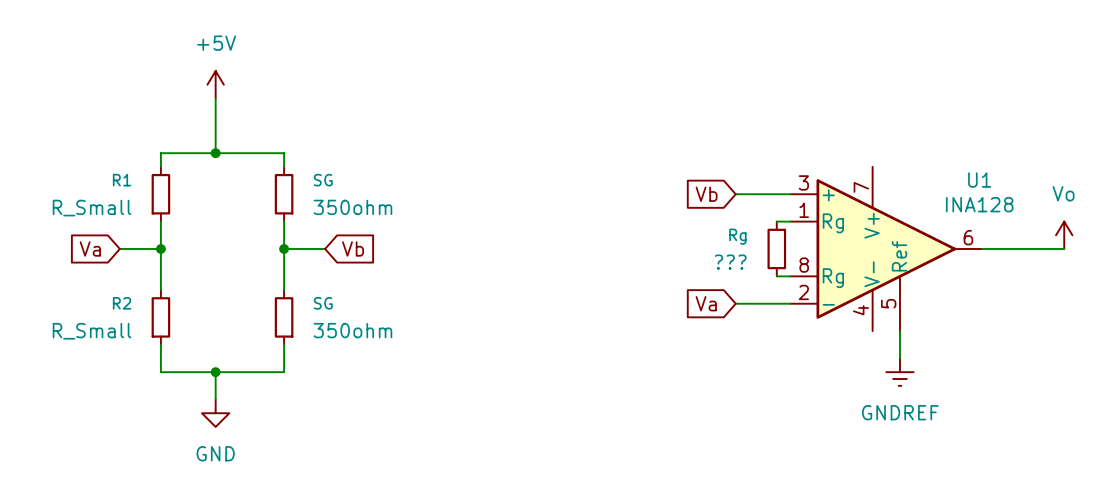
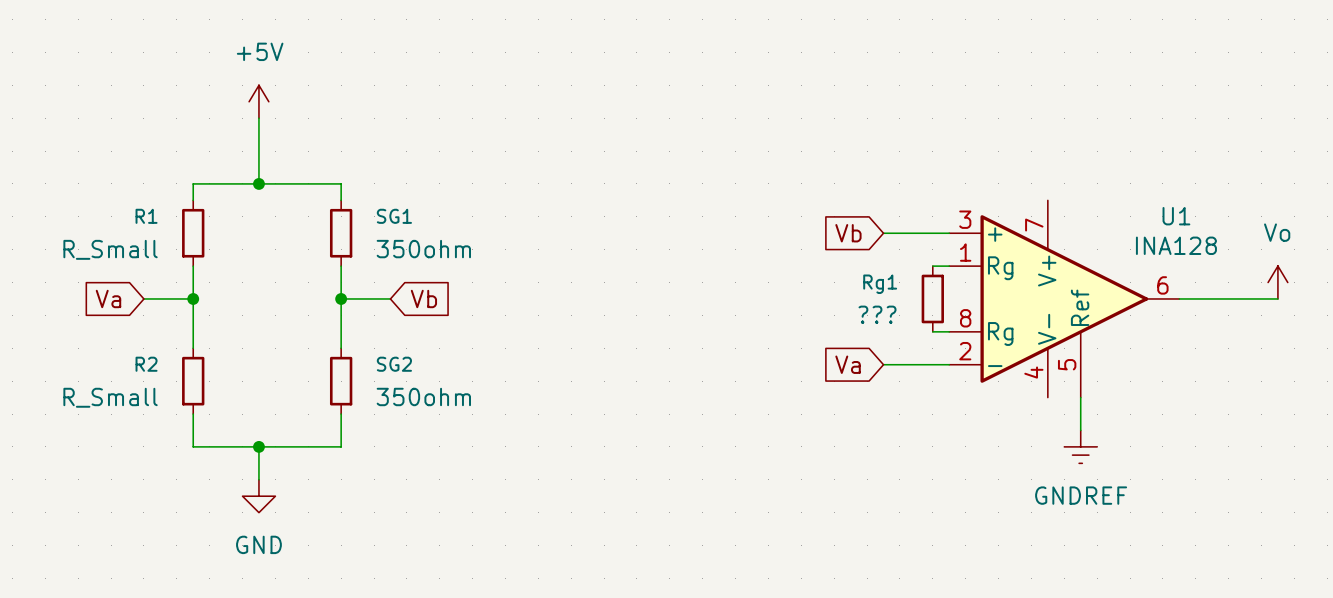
SG name: SG (323, 180) -> SG1 (394, 216)
Rg name: Rg (737, 236) -> Rg1 (880, 284)
SG name: SG (323, 303) -> SG2 (394, 364)

